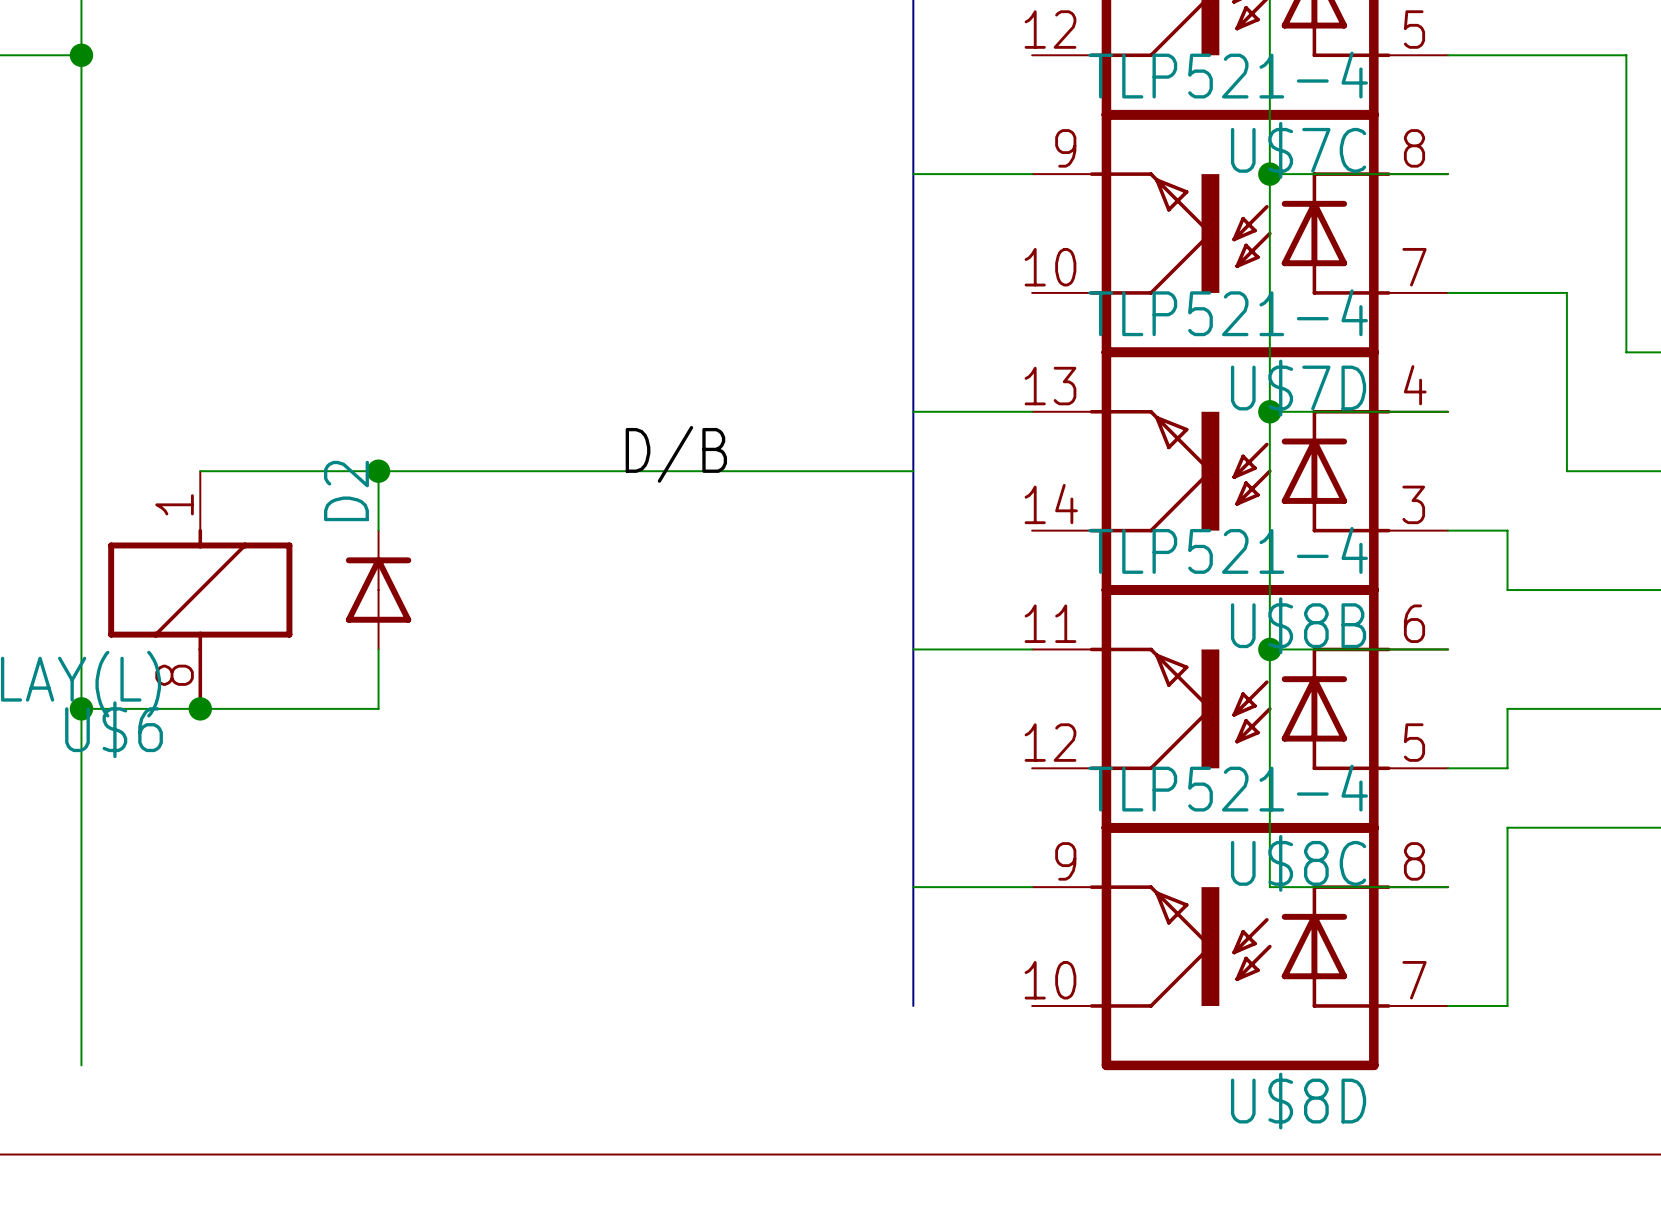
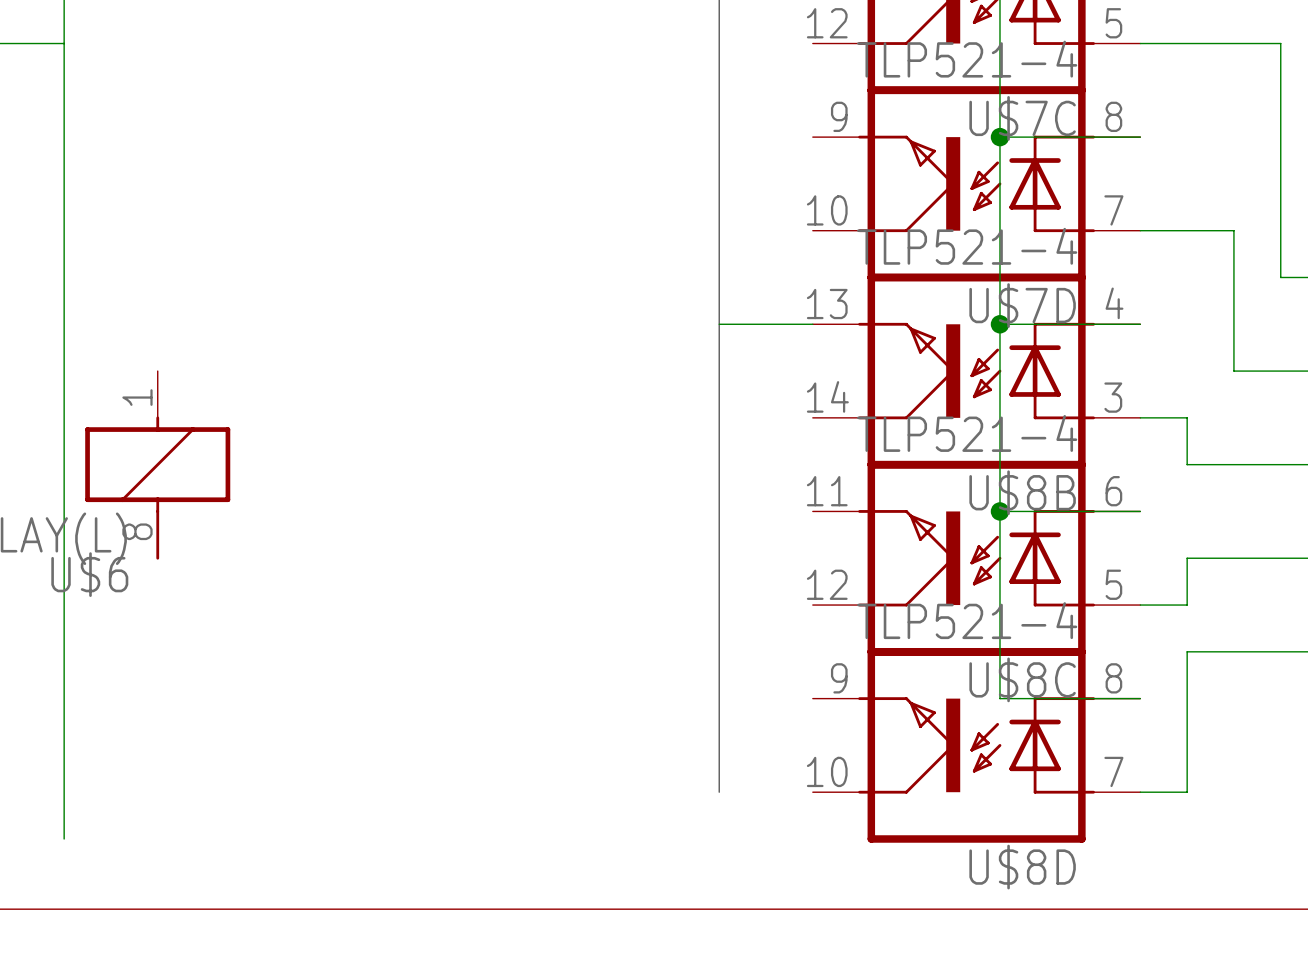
junction: (81, 55) -> none
wire: (913, 174) (1032, 174) -> none
label: D/B (676, 454) -> none
wire: (200, 471) (913, 471) -> none
wire: (378, 471) (378, 530) -> none
junction: (378, 471) -> none
D2: (378, 590) -> none
wire: (378, 649) (378, 708) (81, 708) -> none
wire: (913, 649) (1032, 649) -> none
junction: (81, 708) -> none
junction: (200, 708) -> none
wire: (913, 887) (1032, 887) -> none

